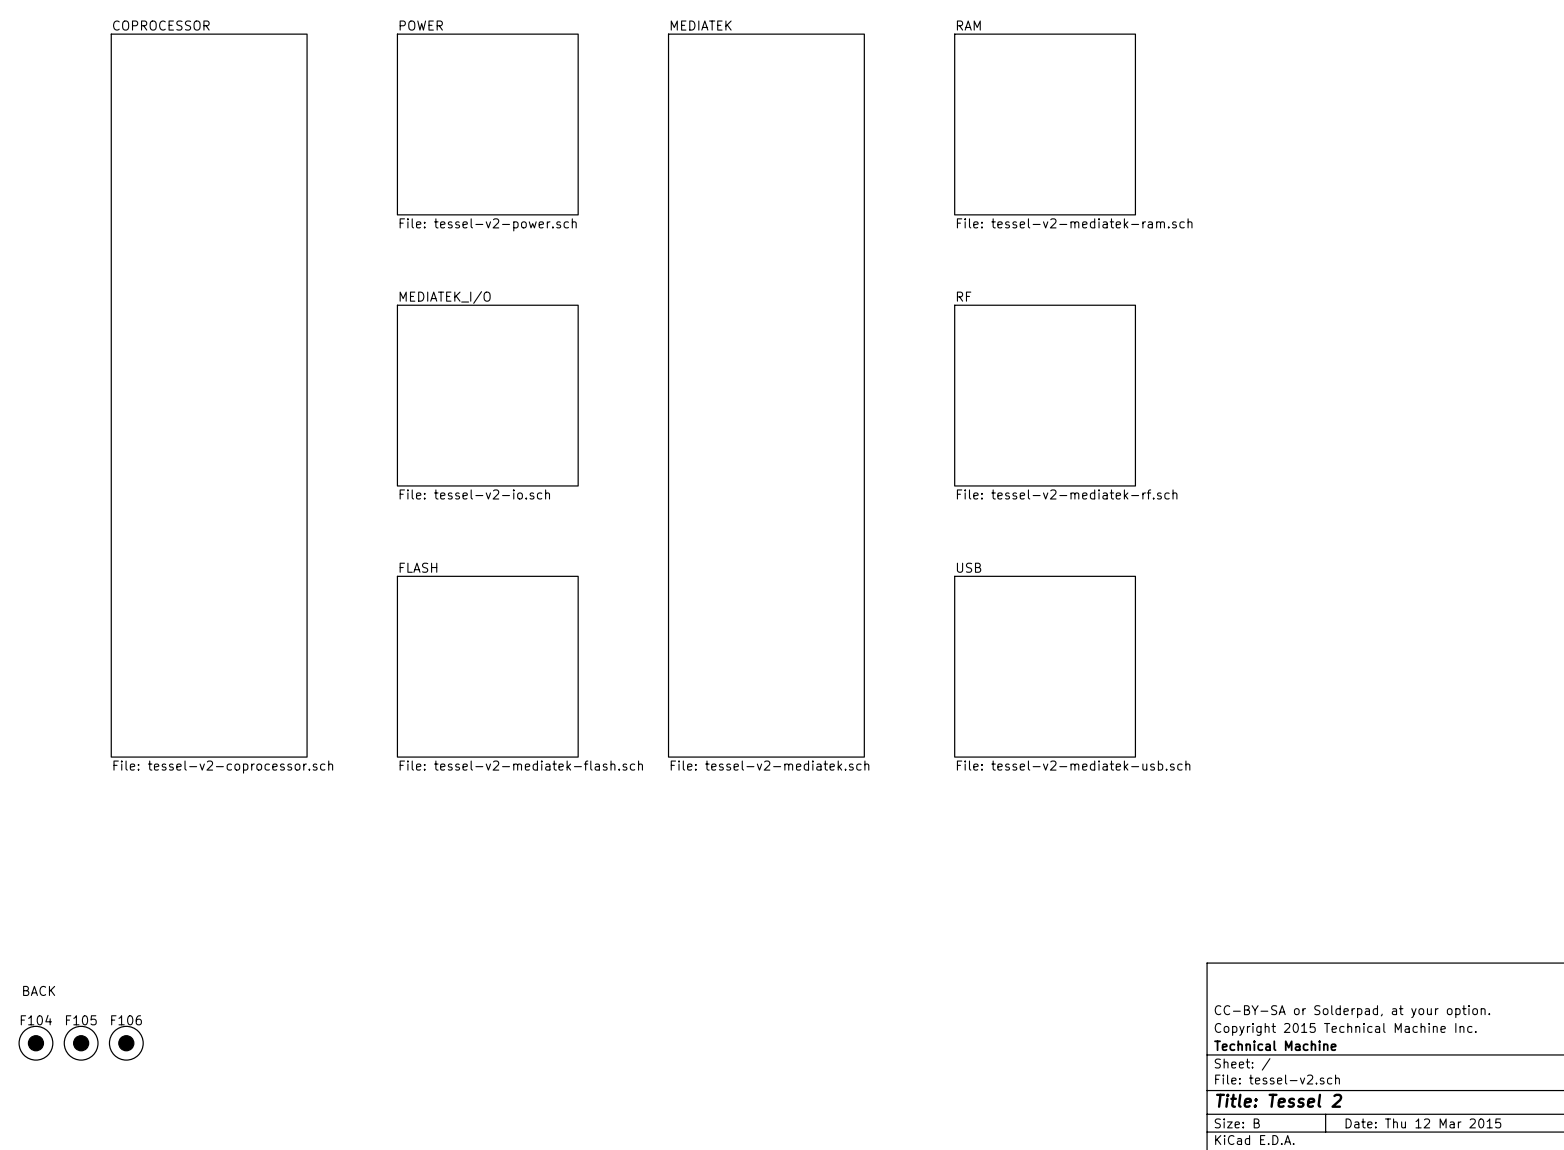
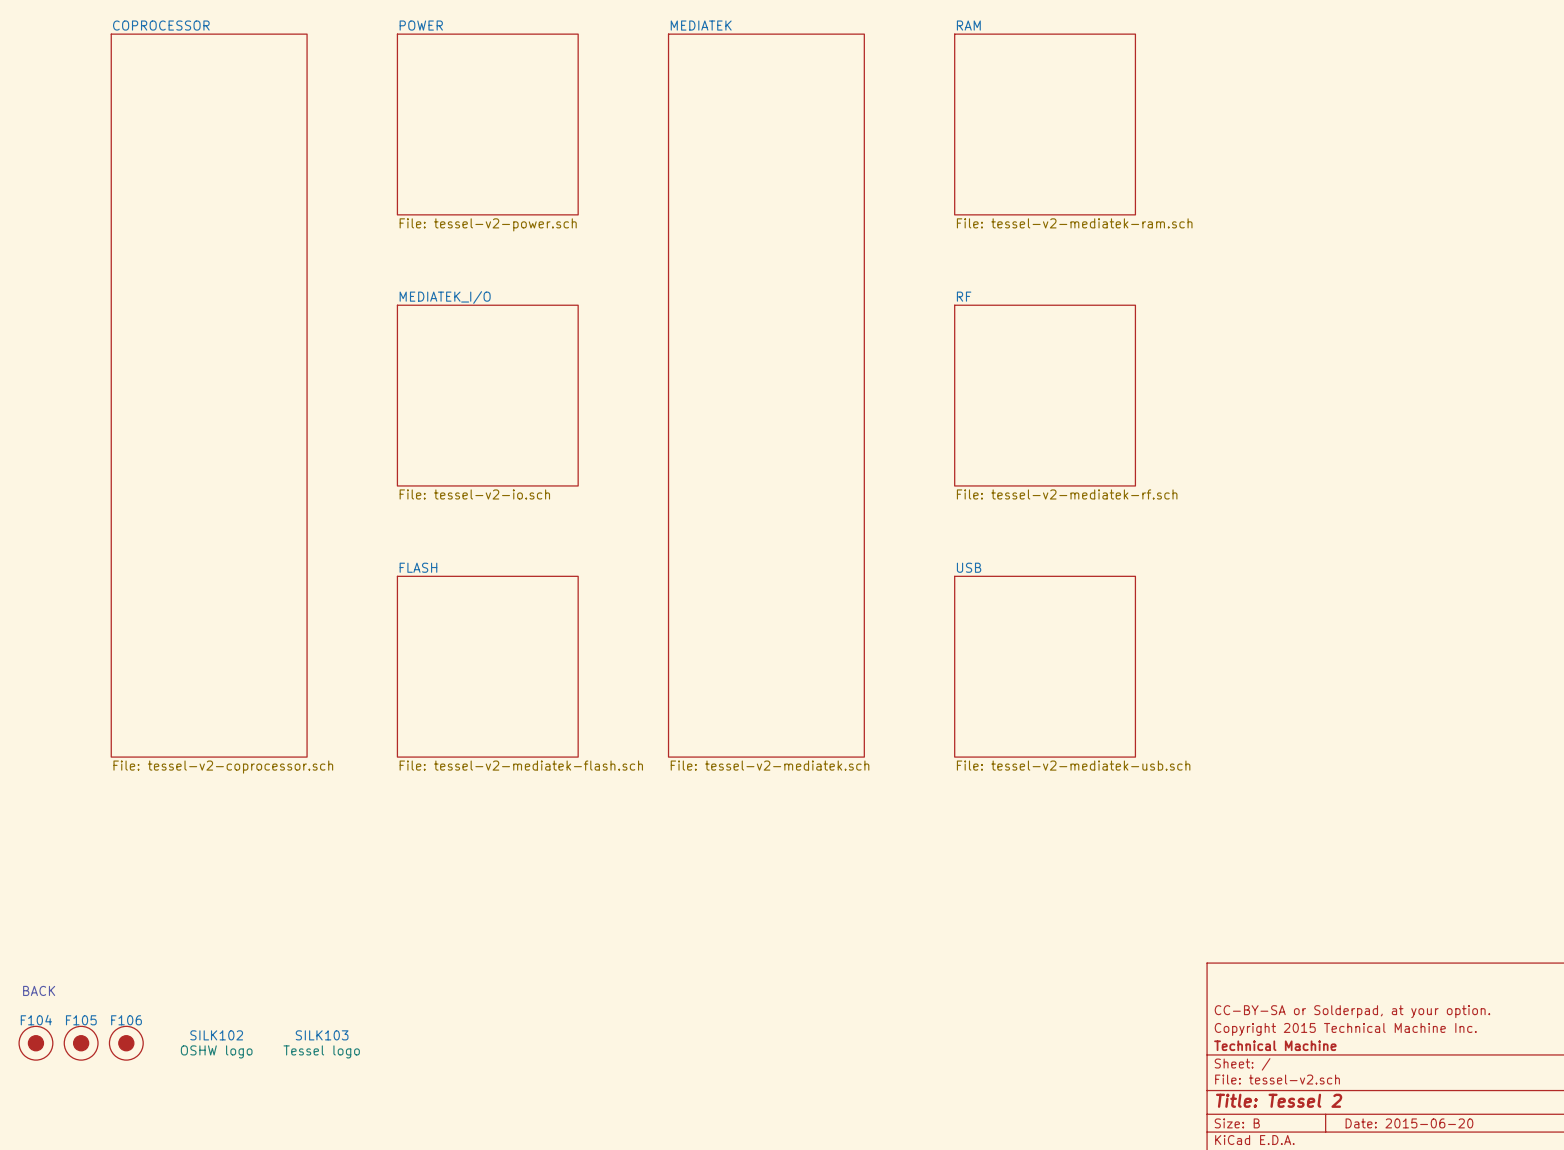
SILK102: none -> OSHW logo (216, 1044)
SILK103: none -> Tessel logo (321, 1044)
title block: Date: Thu 12 Mar 2015 (1423, 1123) -> Date: 2015-06-20 (1409, 1123)

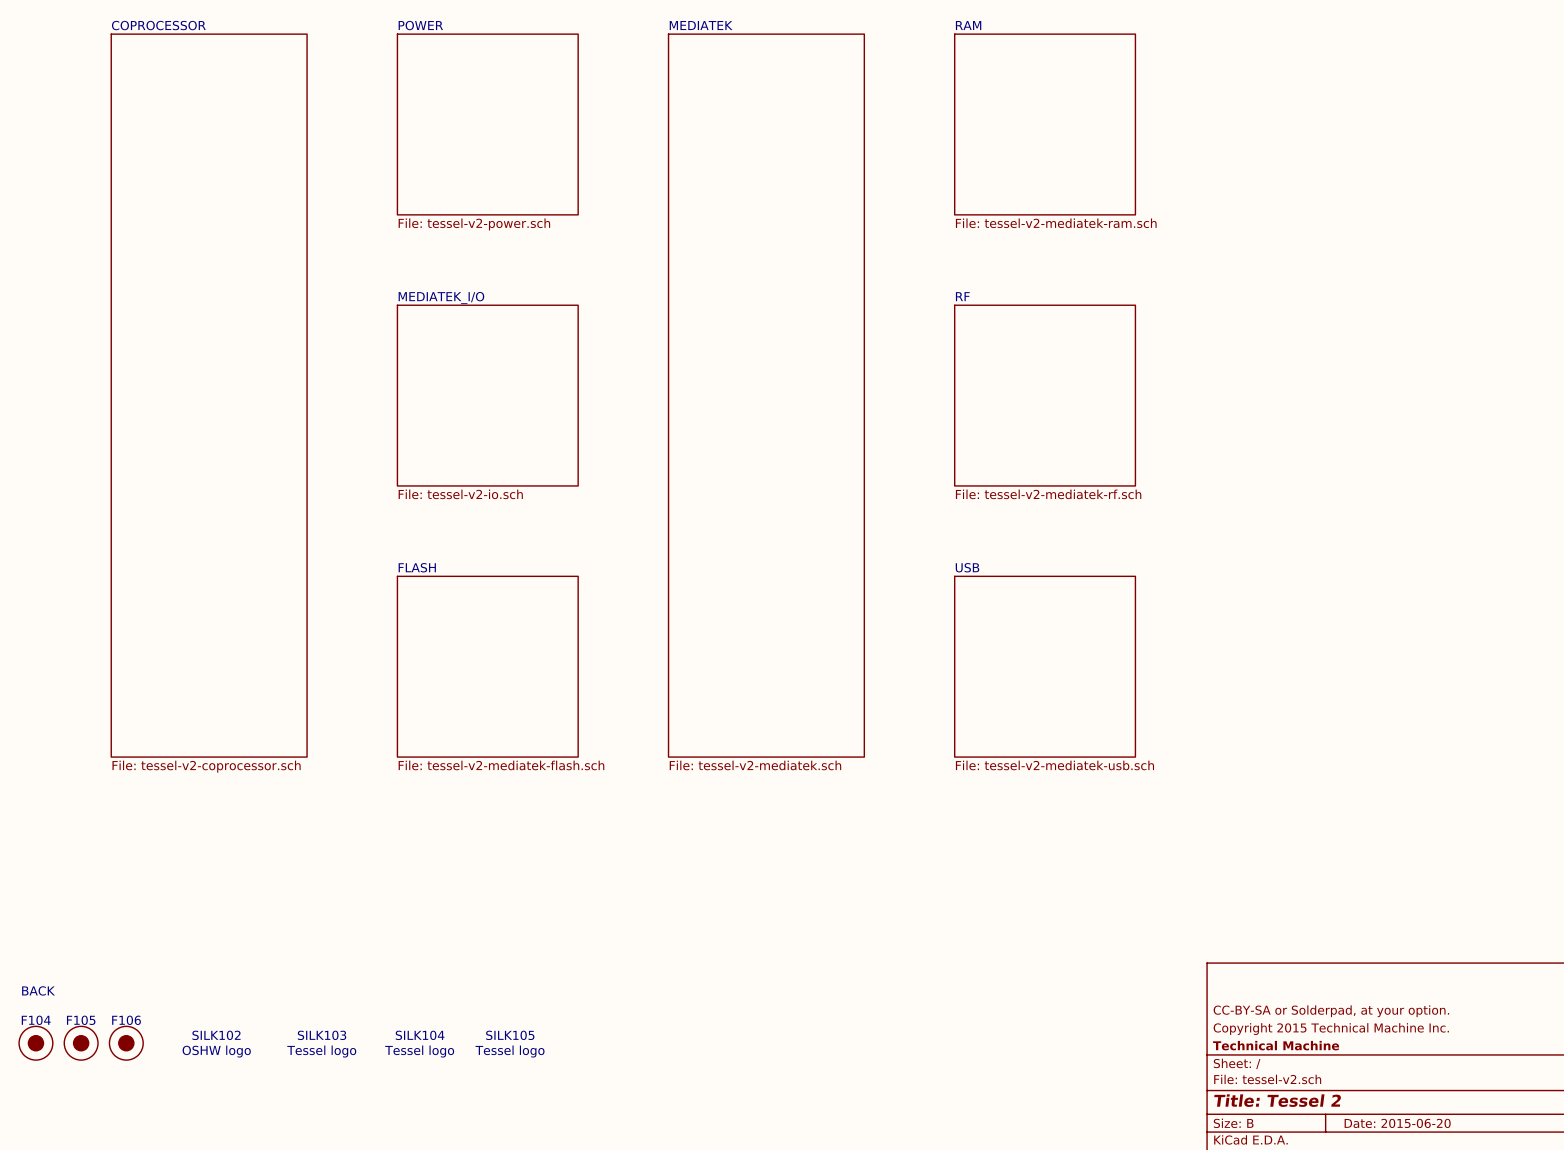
SILK104: none -> Tessel logo (419, 1044)
SILK105: none -> Tessel logo (510, 1044)

